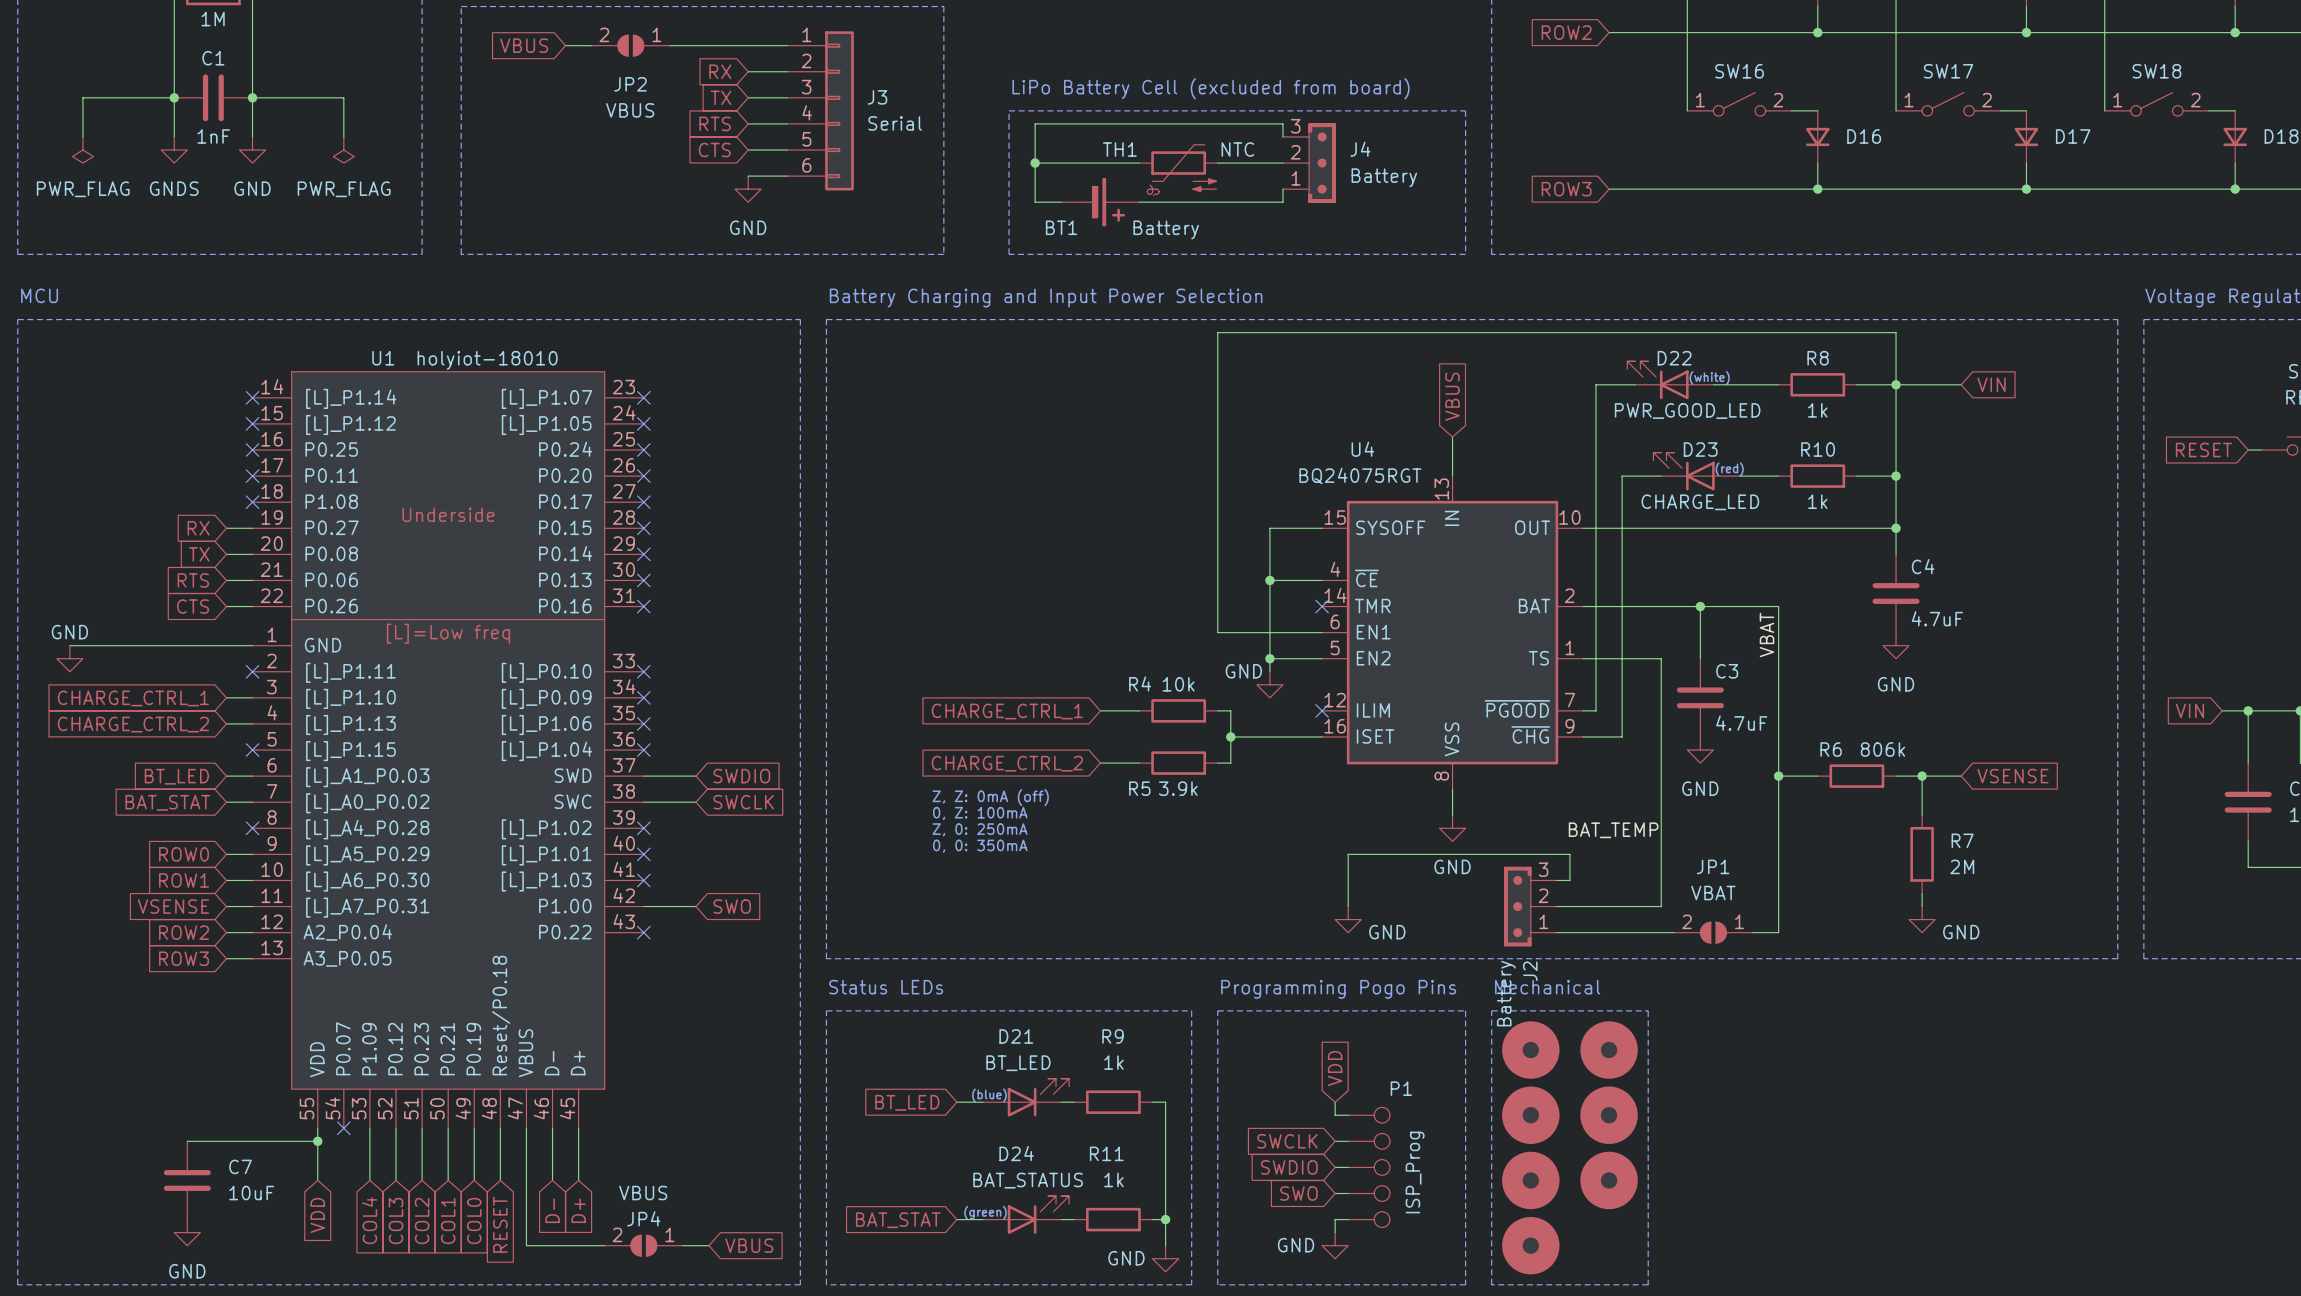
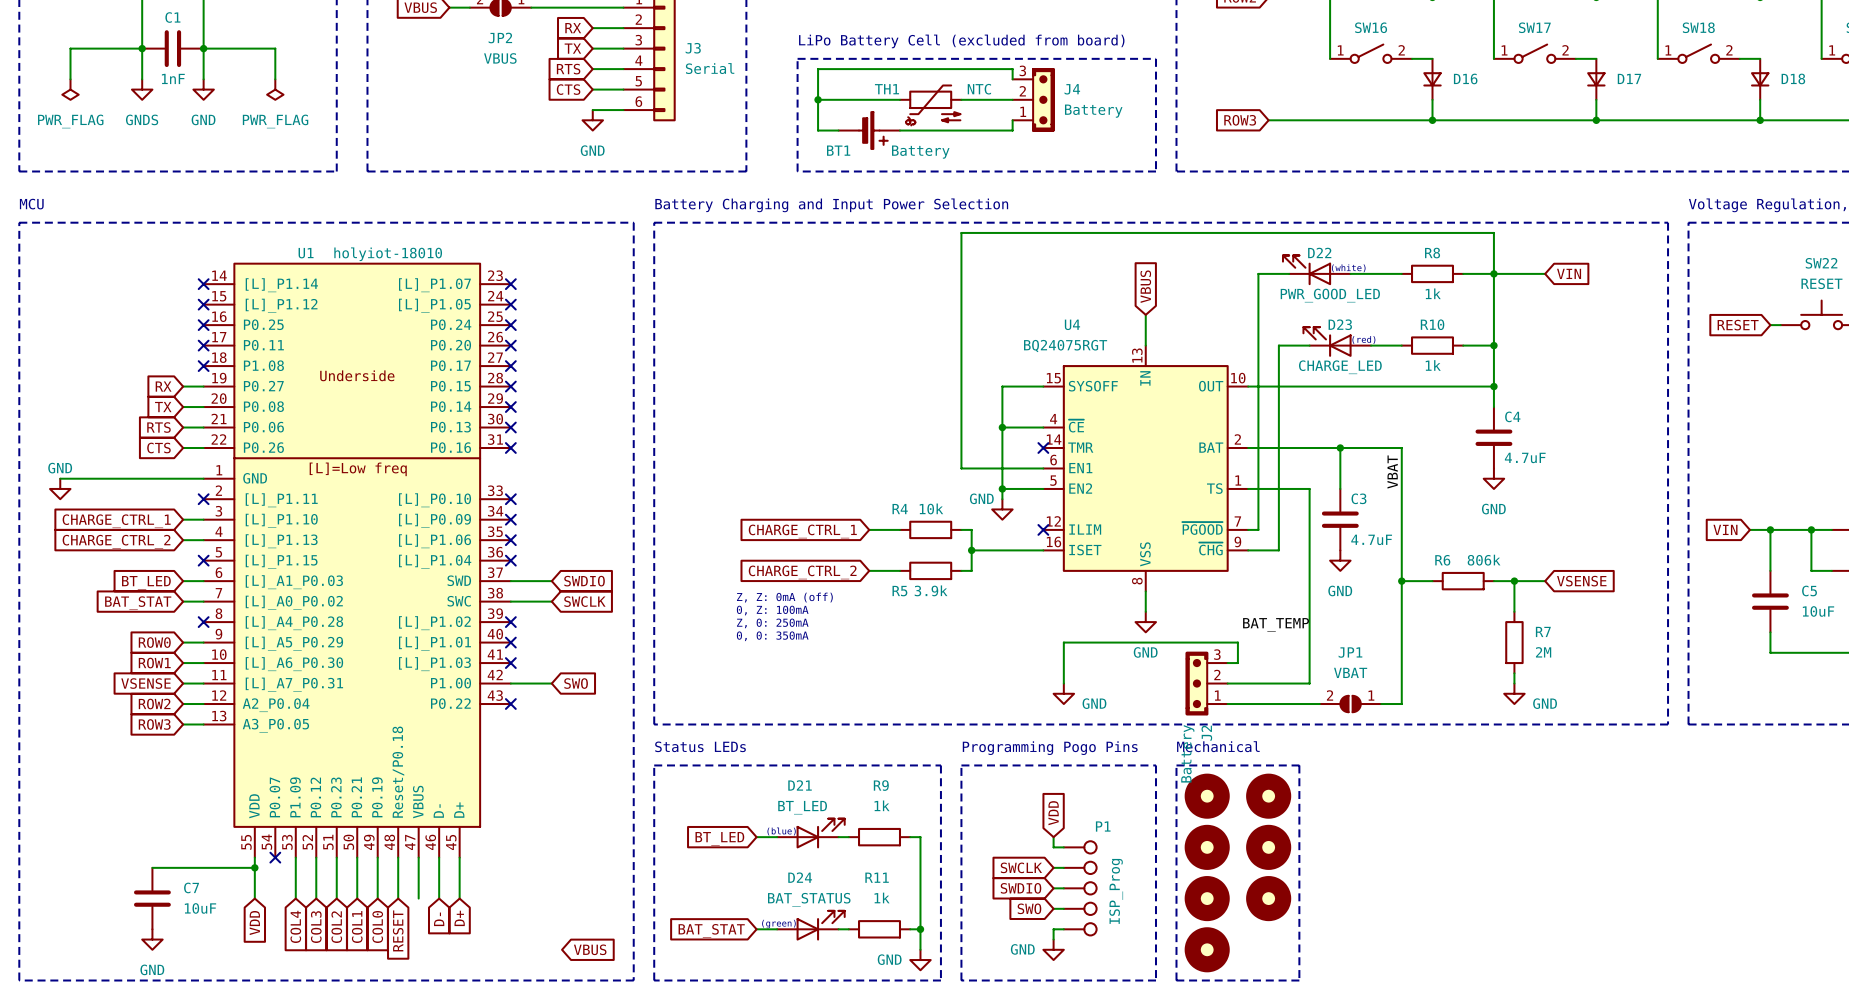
wire: (526, 1180) (526, 1245) (604, 1245) -> none
JP4: VBUS (643, 1245) -> none
wire: (682, 1245) (709, 1245) -> none

